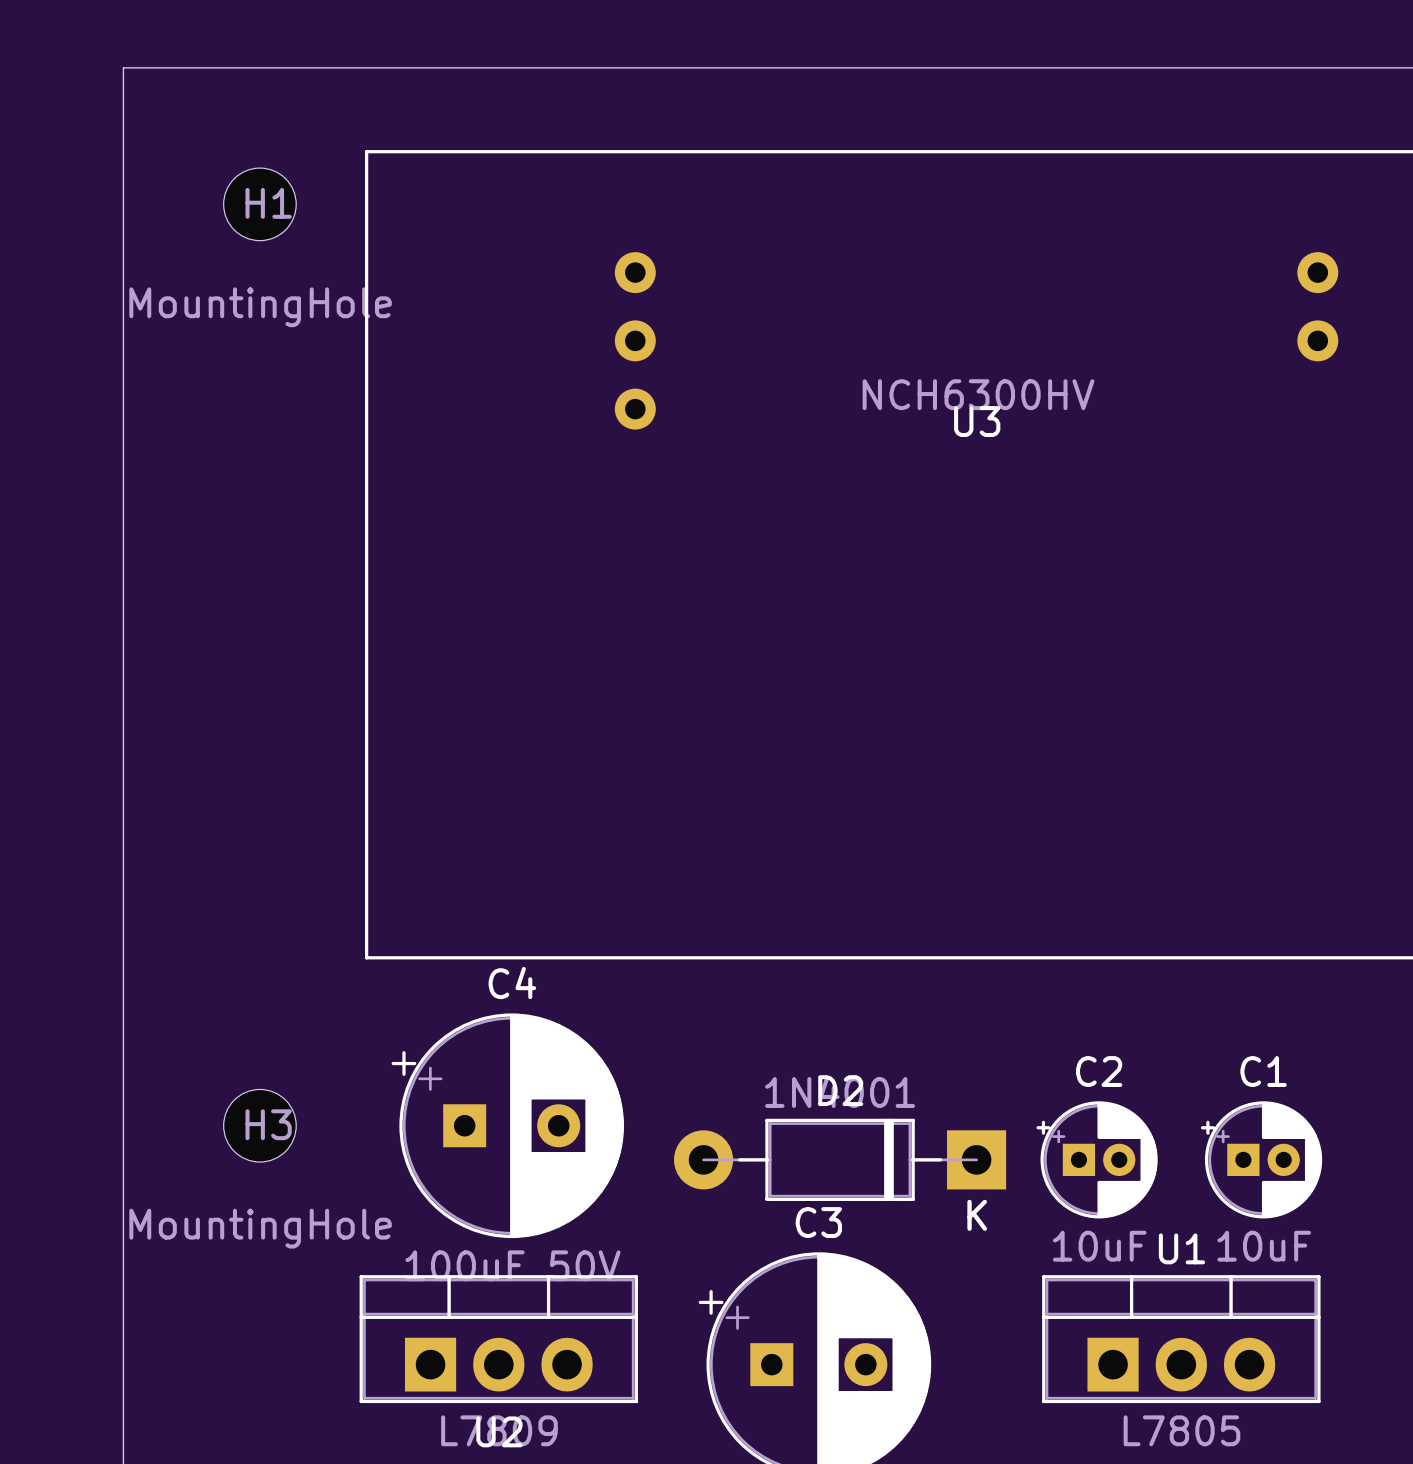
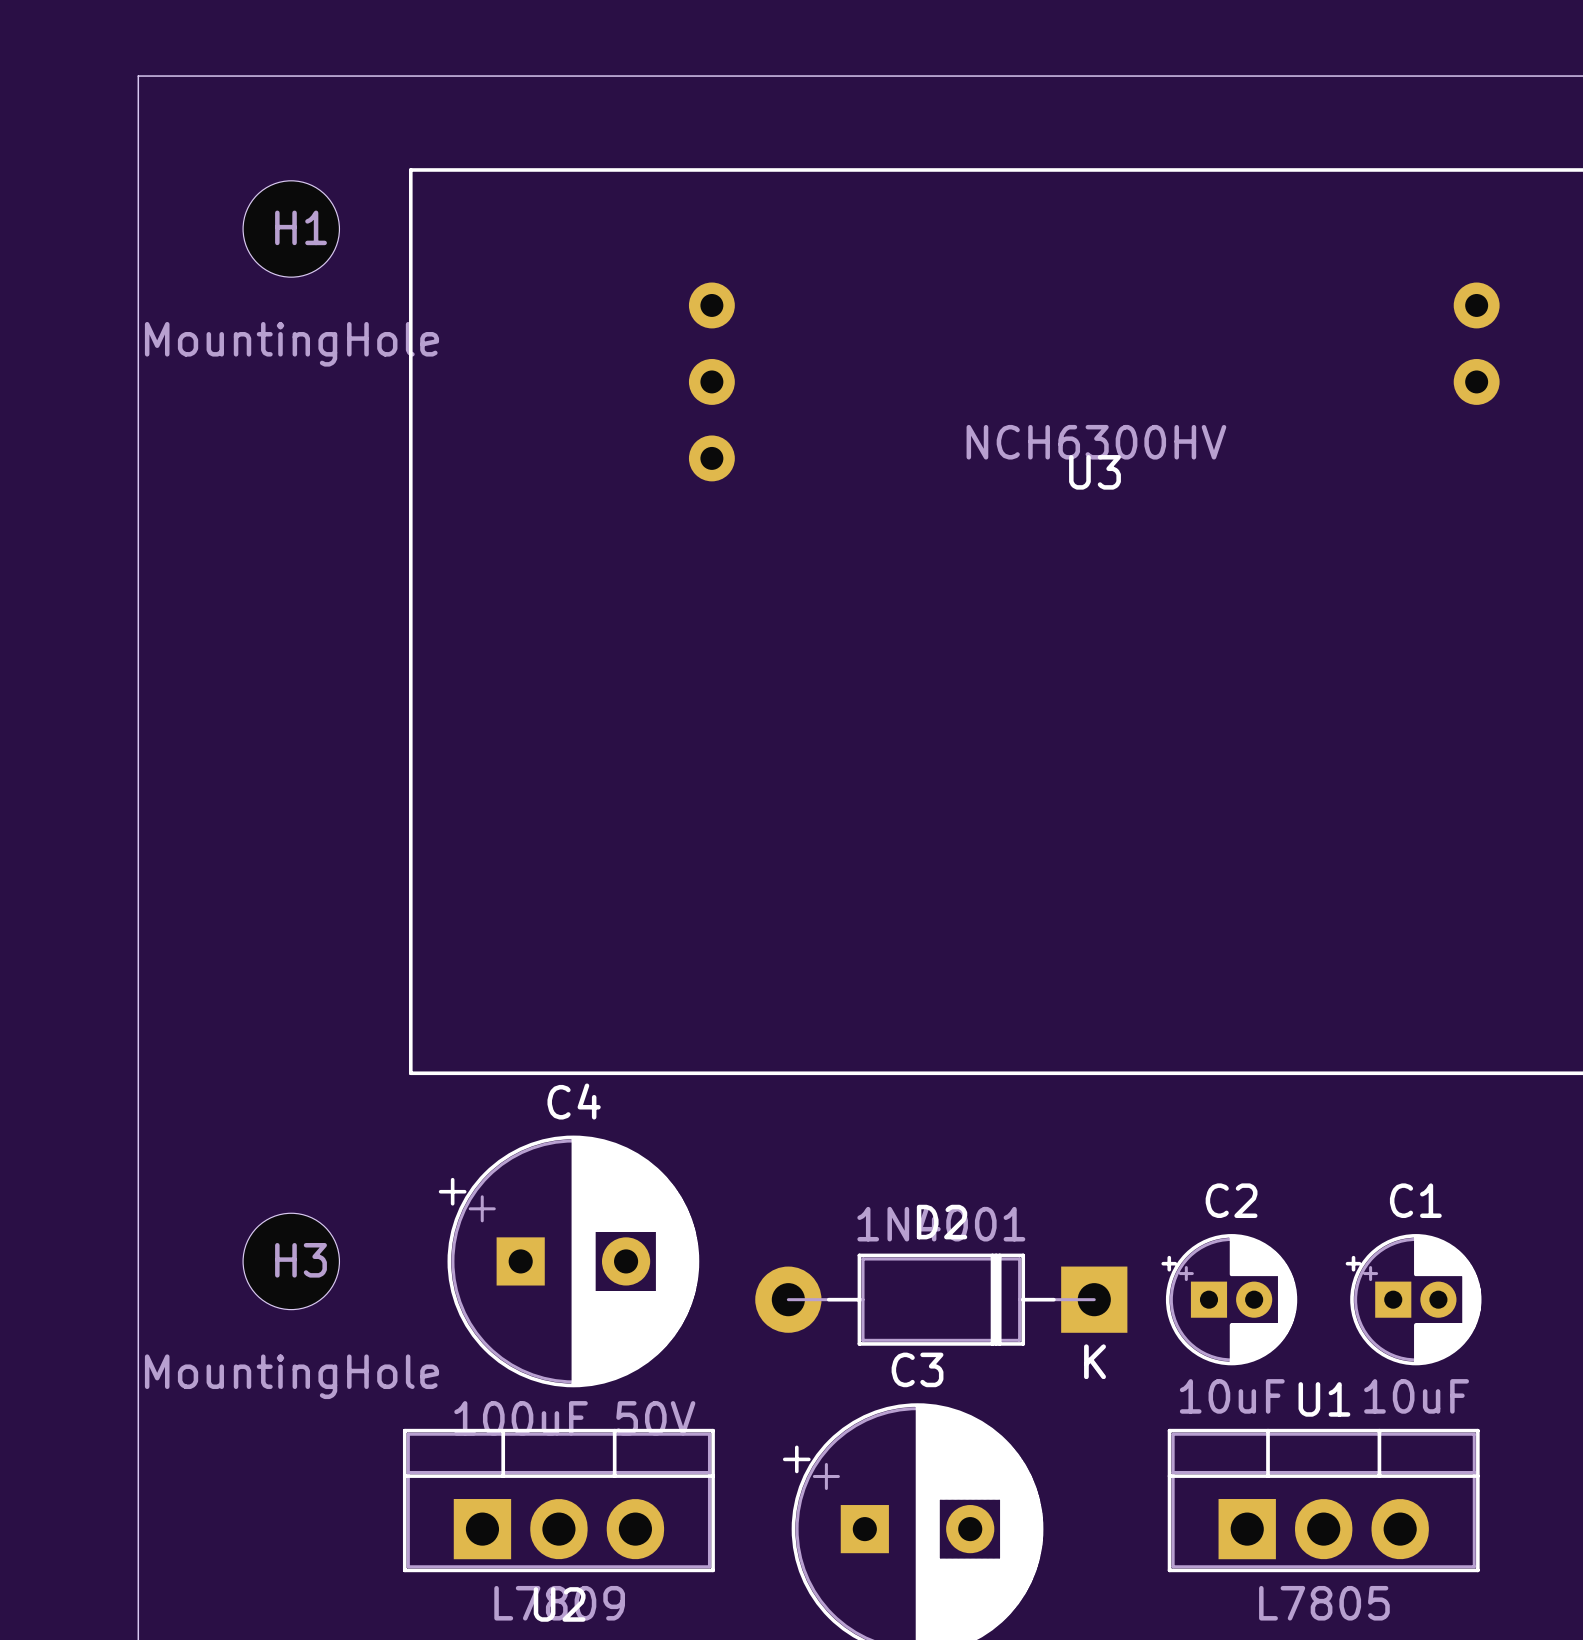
H1 footprint: [223, 168, 297, 241] -> [243, 180, 340, 278]
H3 footprint: [223, 1089, 297, 1163] -> [243, 1213, 340, 1310]

